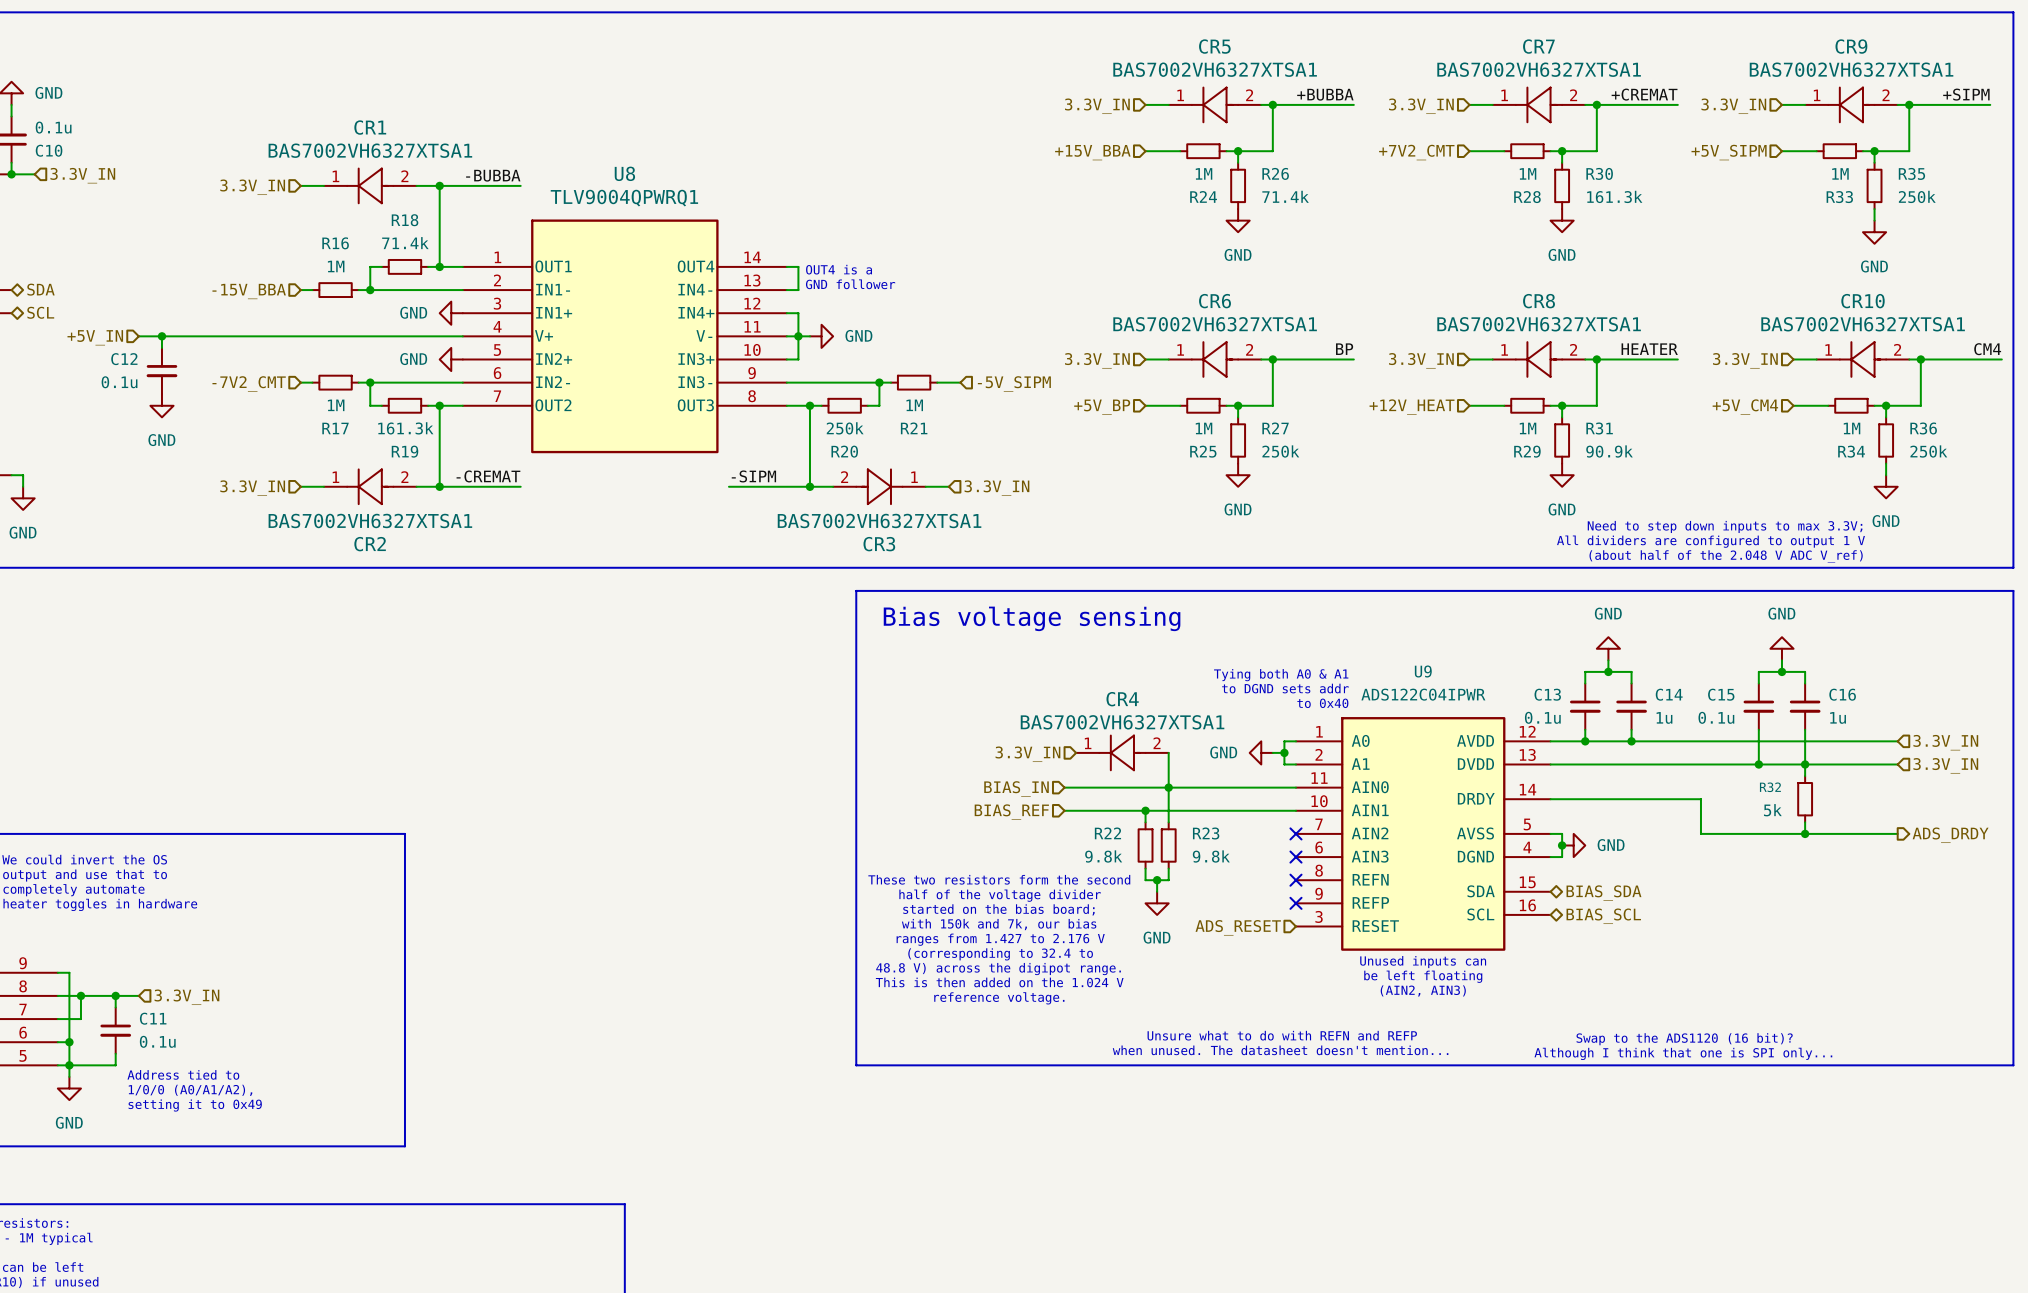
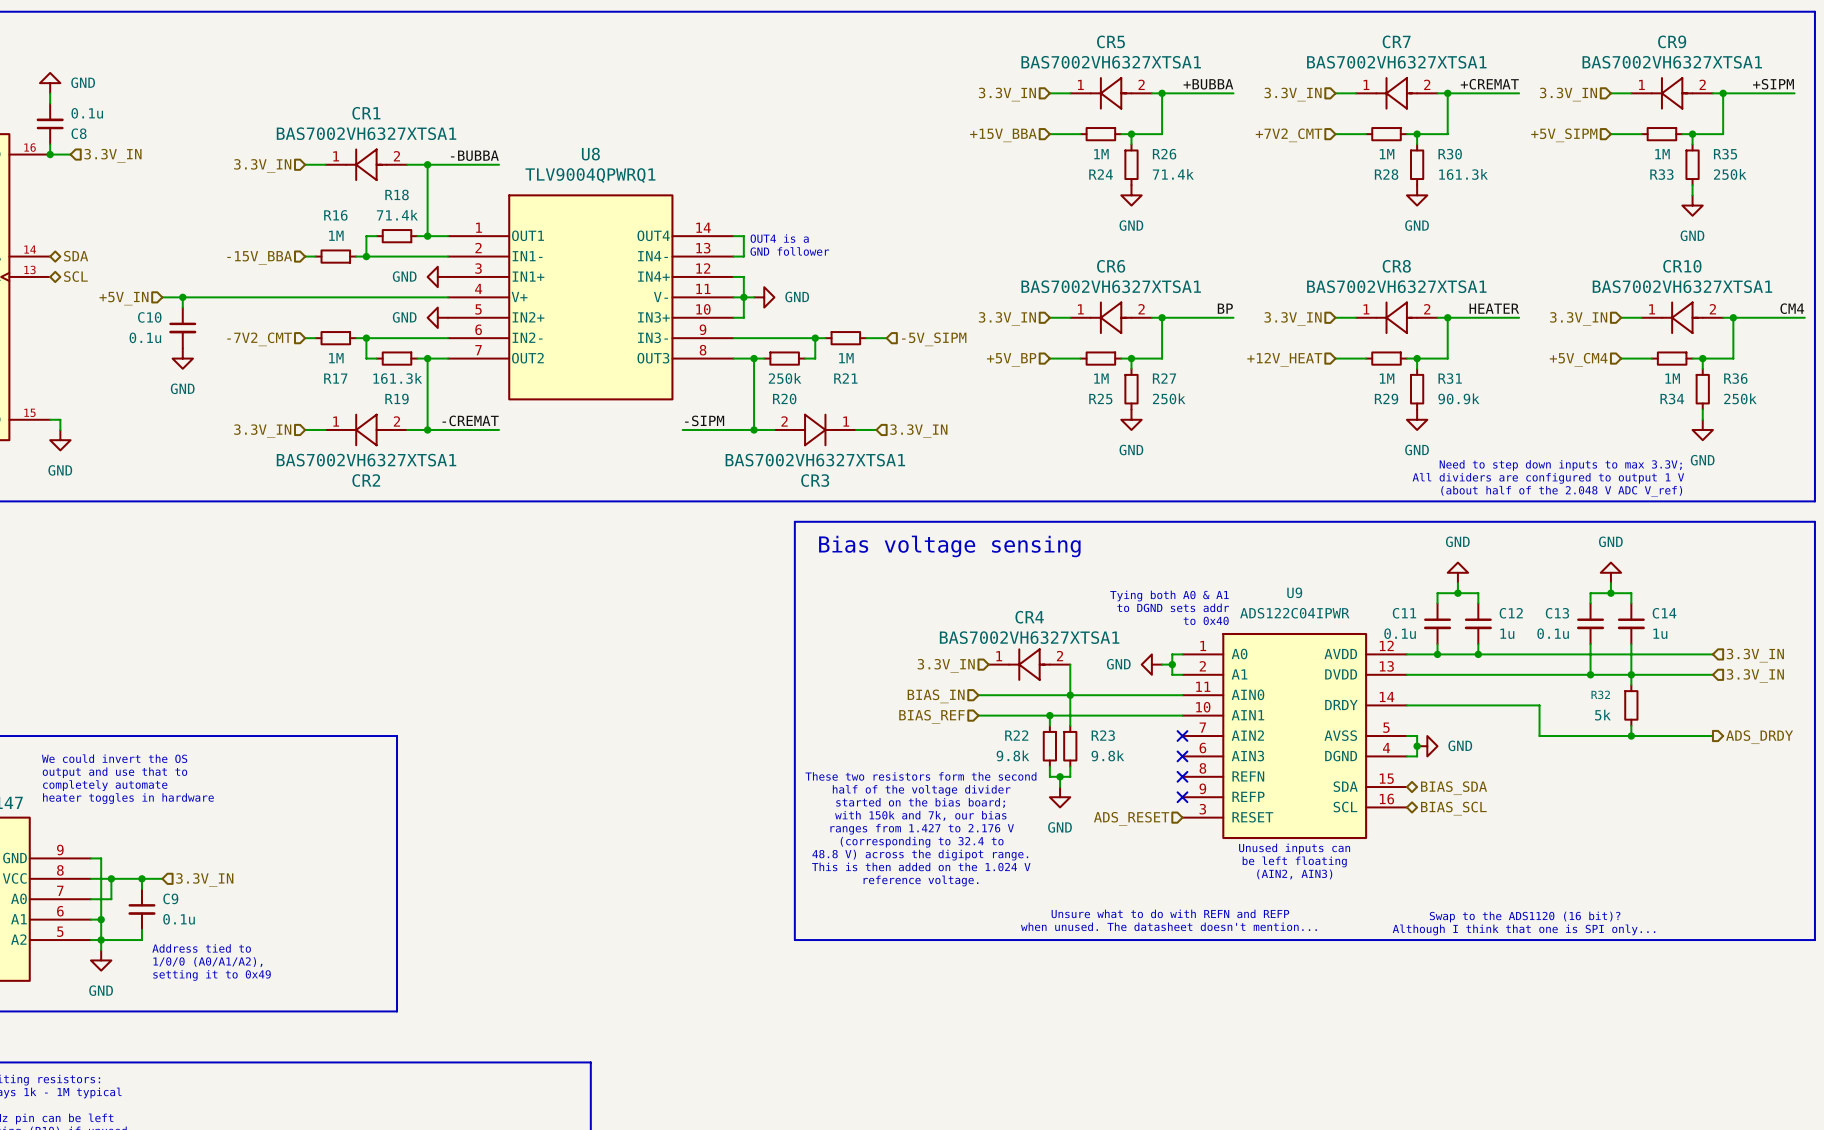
C10 name: C10 (49, 150) -> C8 (79, 133)
C12 name: C12 (124, 359) -> C10 (149, 317)
C13 name: C13 (1547, 694) -> C11 (1404, 613)
C14 name: C14 (1669, 694) -> C12 (1511, 613)
C15 name: C15 (1721, 694) -> C13 (1557, 613)
C16 name: C16 (1842, 694) -> C14 (1664, 613)
C11 name: C11 (153, 1018) -> C9 (170, 898)

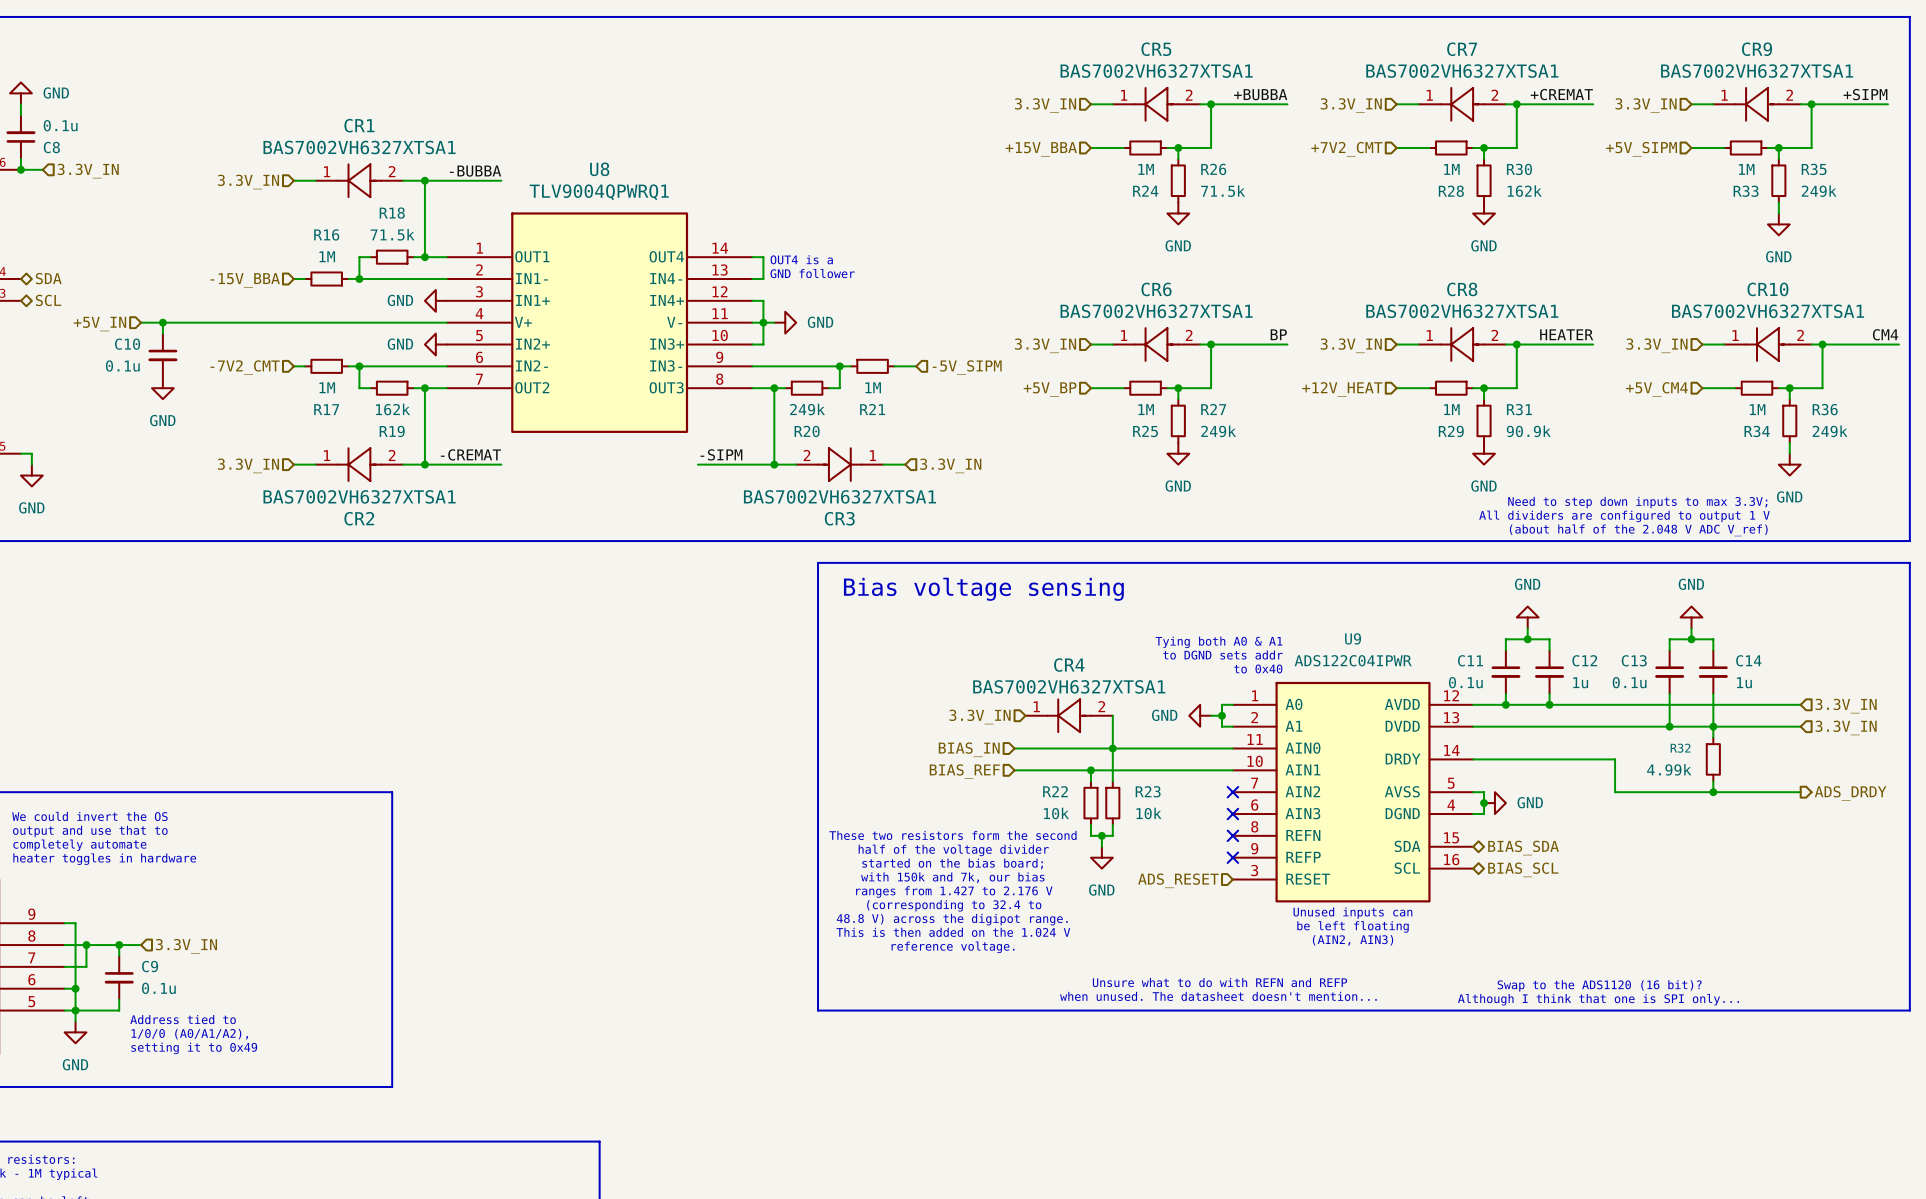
R26 value: 71.4k (1173, 174) -> 71.5k (1223, 191)
R30 value: 161.3k (1463, 174) -> 162k (1524, 191)
R35 value: 250k (1730, 174) -> 249k (1819, 191)
R18 value: 71.4k (397, 215) -> 71.5k (392, 234)
R19 value: 161.3k (397, 378) -> 162k (392, 409)
R20 value: 250k (785, 378) -> 249k (807, 409)
R27 value: 250k (1169, 398) -> 249k (1218, 431)
R36 value: 250k (1740, 398) -> 249k (1830, 431)
R32 value: 5k (1602, 715) -> 4.99k (1669, 769)
R22 value: 9.8k (1012, 755) -> 10k (1056, 813)
R23 value: 9.8k (1107, 755) -> 10k (1148, 813)

